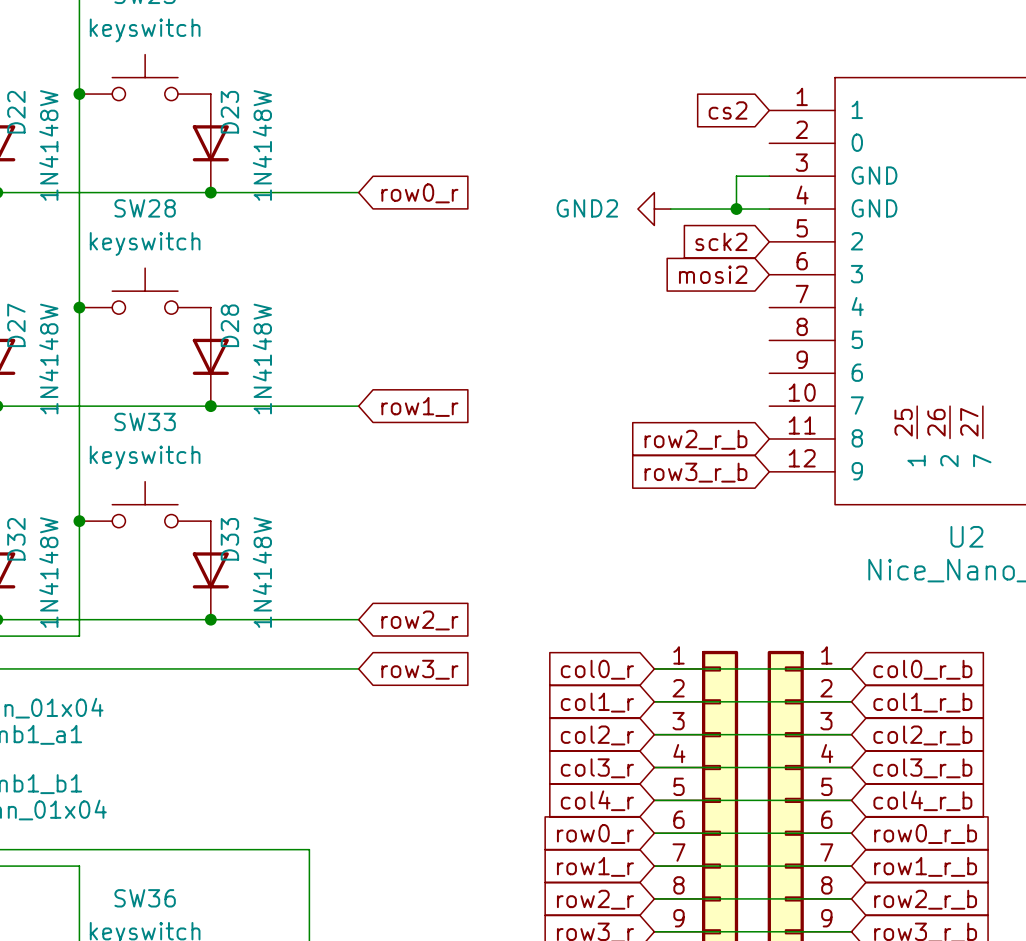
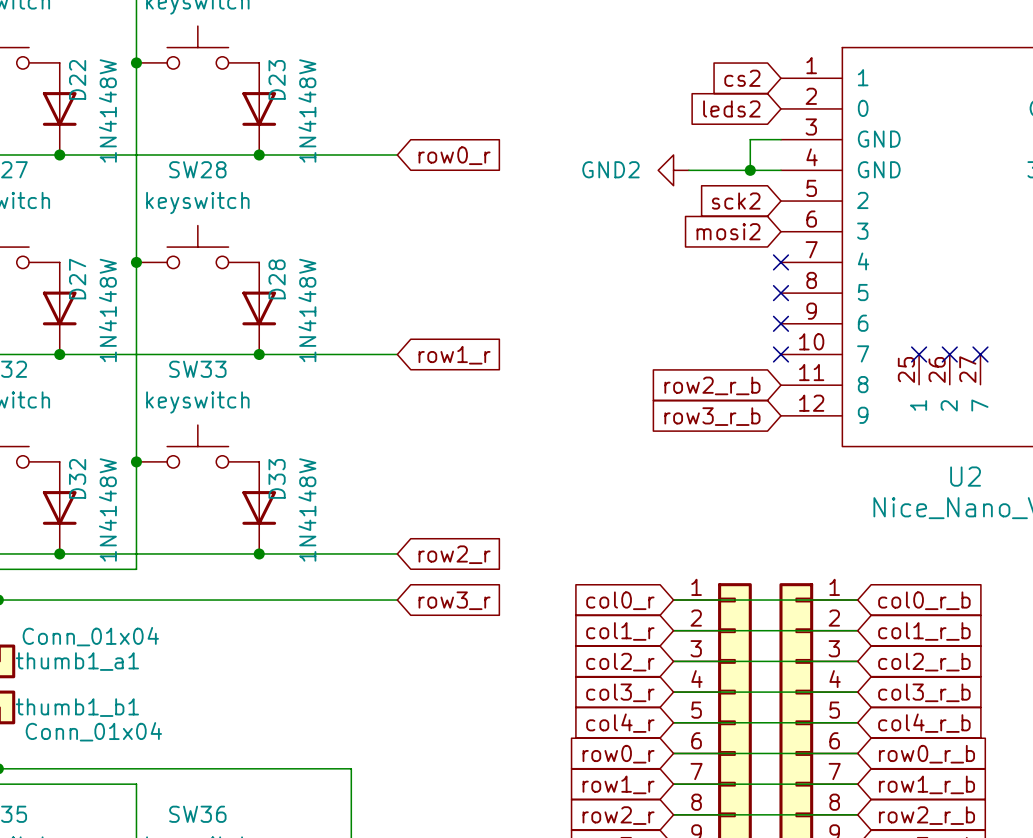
global label: none -> leds2 (731, 108)
no-connect mark: none -> (780, 262)
no-connect mark: none -> (780, 293)
no-connect mark: none -> (780, 323)
no-connect mark: none -> (780, 354)
no-connect mark: none -> (919, 354)
no-connect mark: none -> (949, 354)
no-connect mark: none -> (980, 354)

